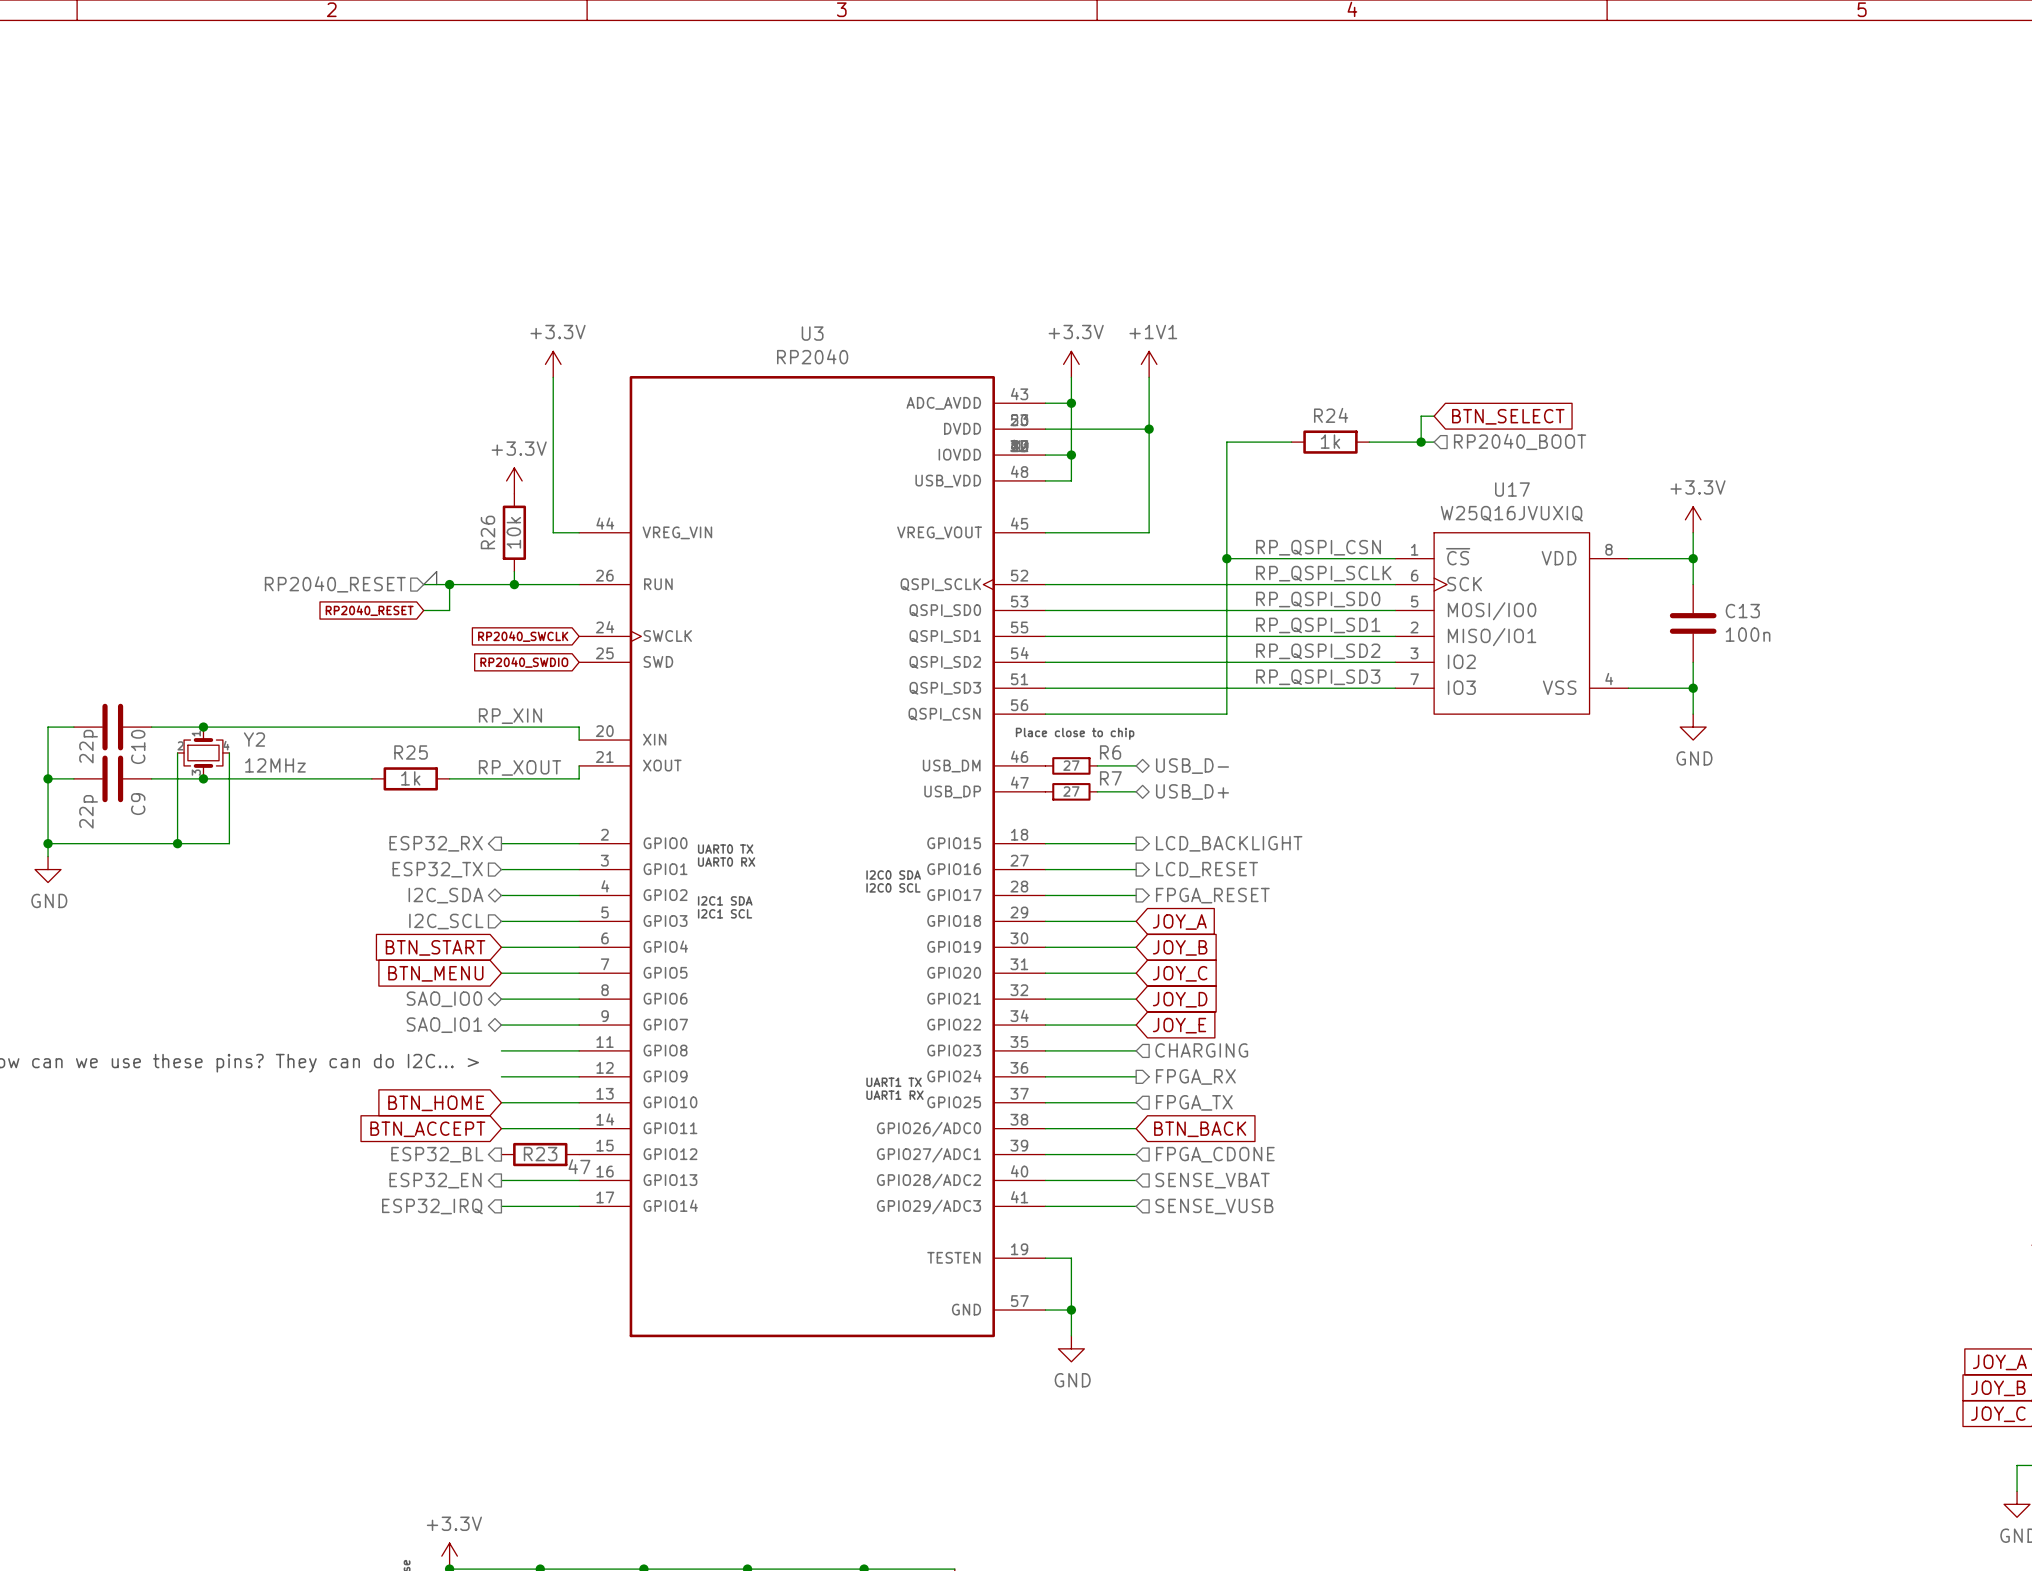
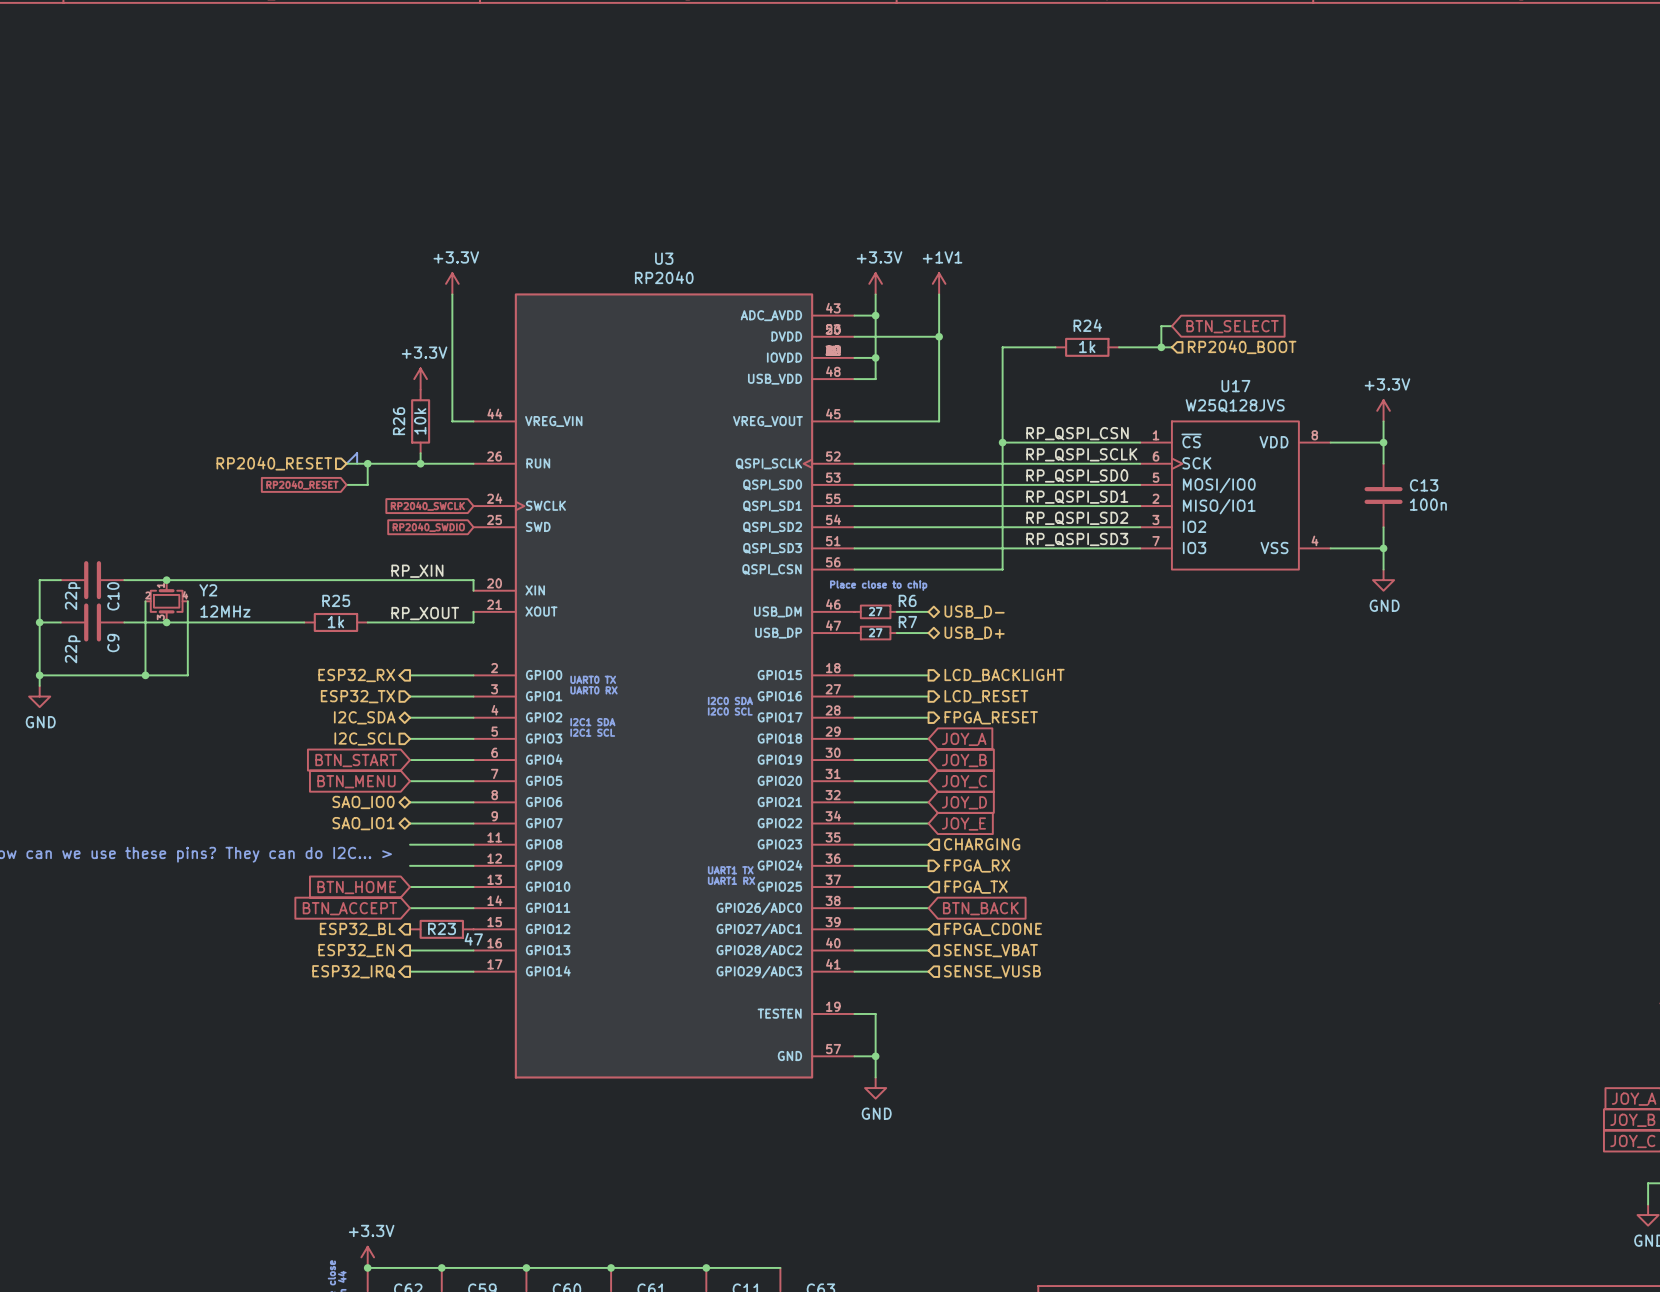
U17 value: W25Q16JVUXIQ (1511, 513) -> W25Q128JVS (1235, 405)

